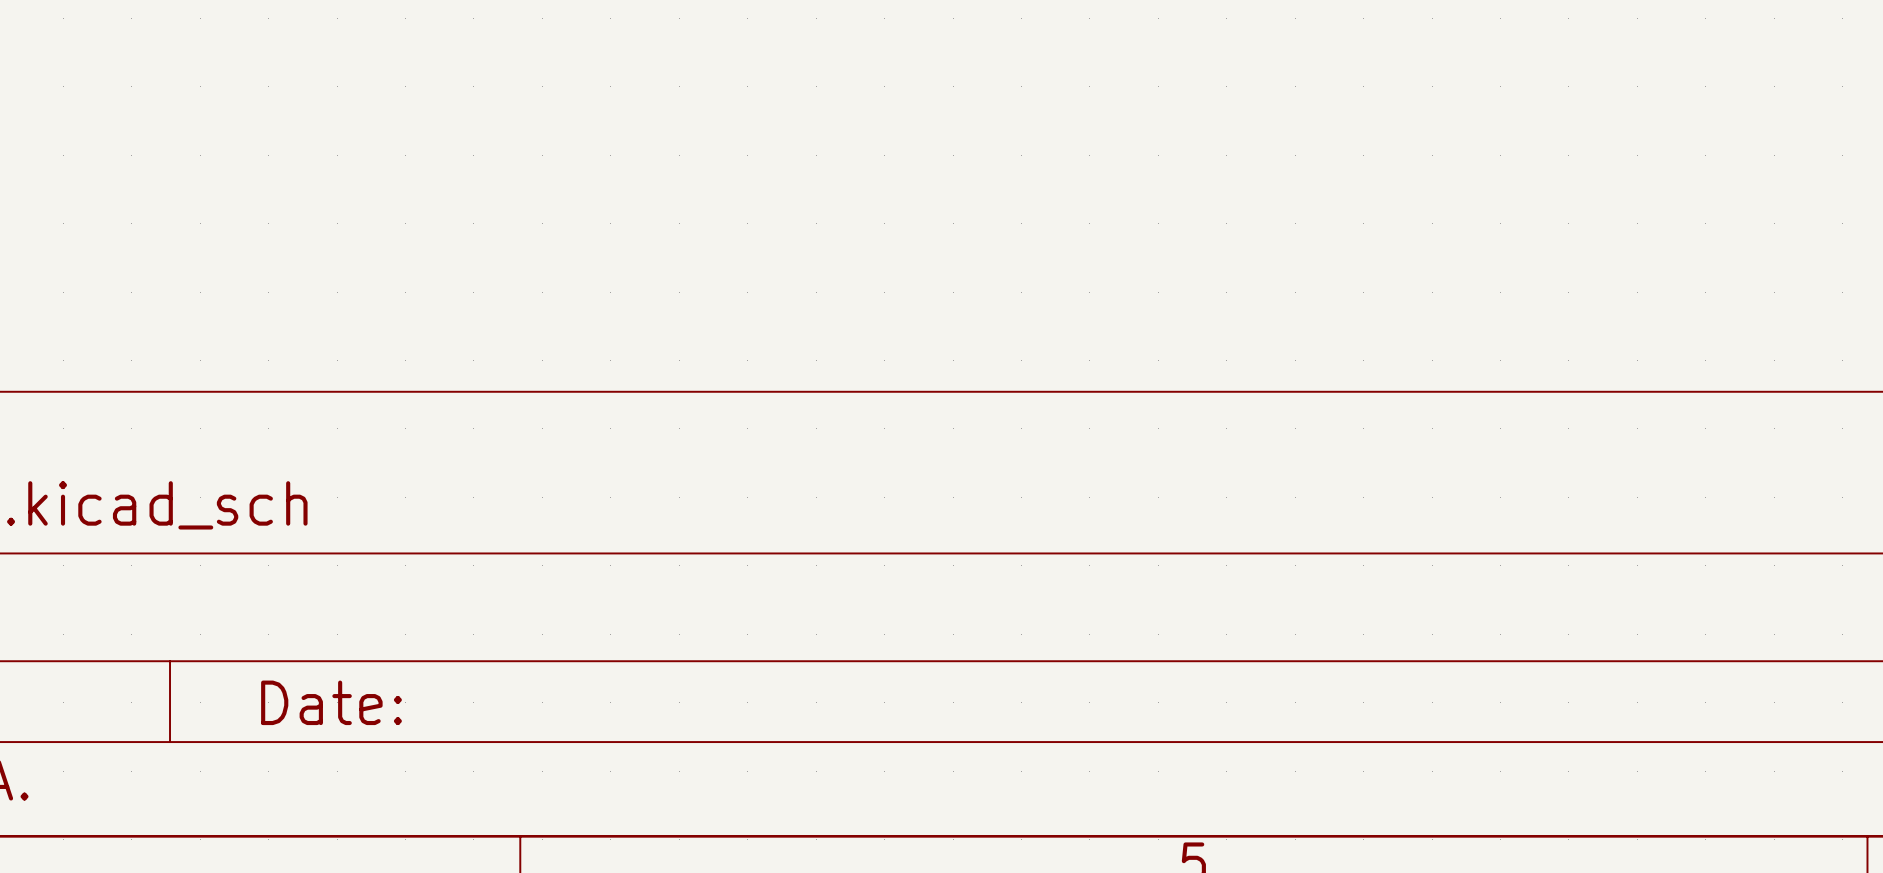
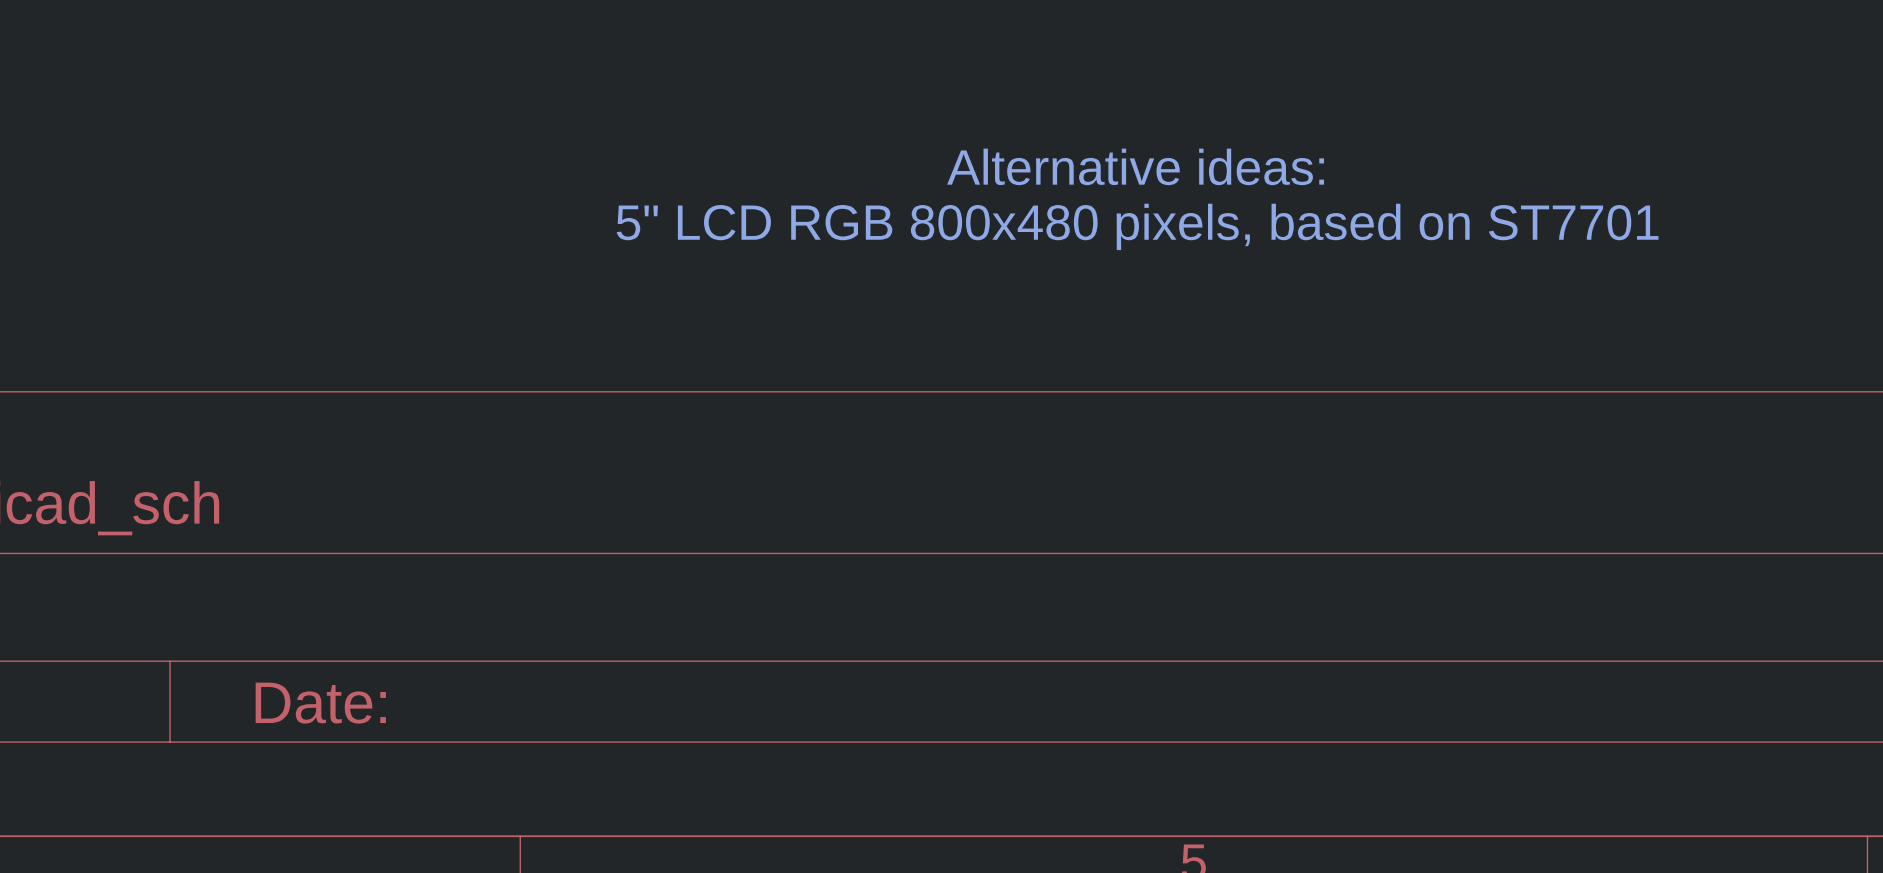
text: none -> Alternative ideas: (1135, 166)
text: none -> 5" LCD RGB 800x480 pixels, based on ST7701 (1137, 226)

